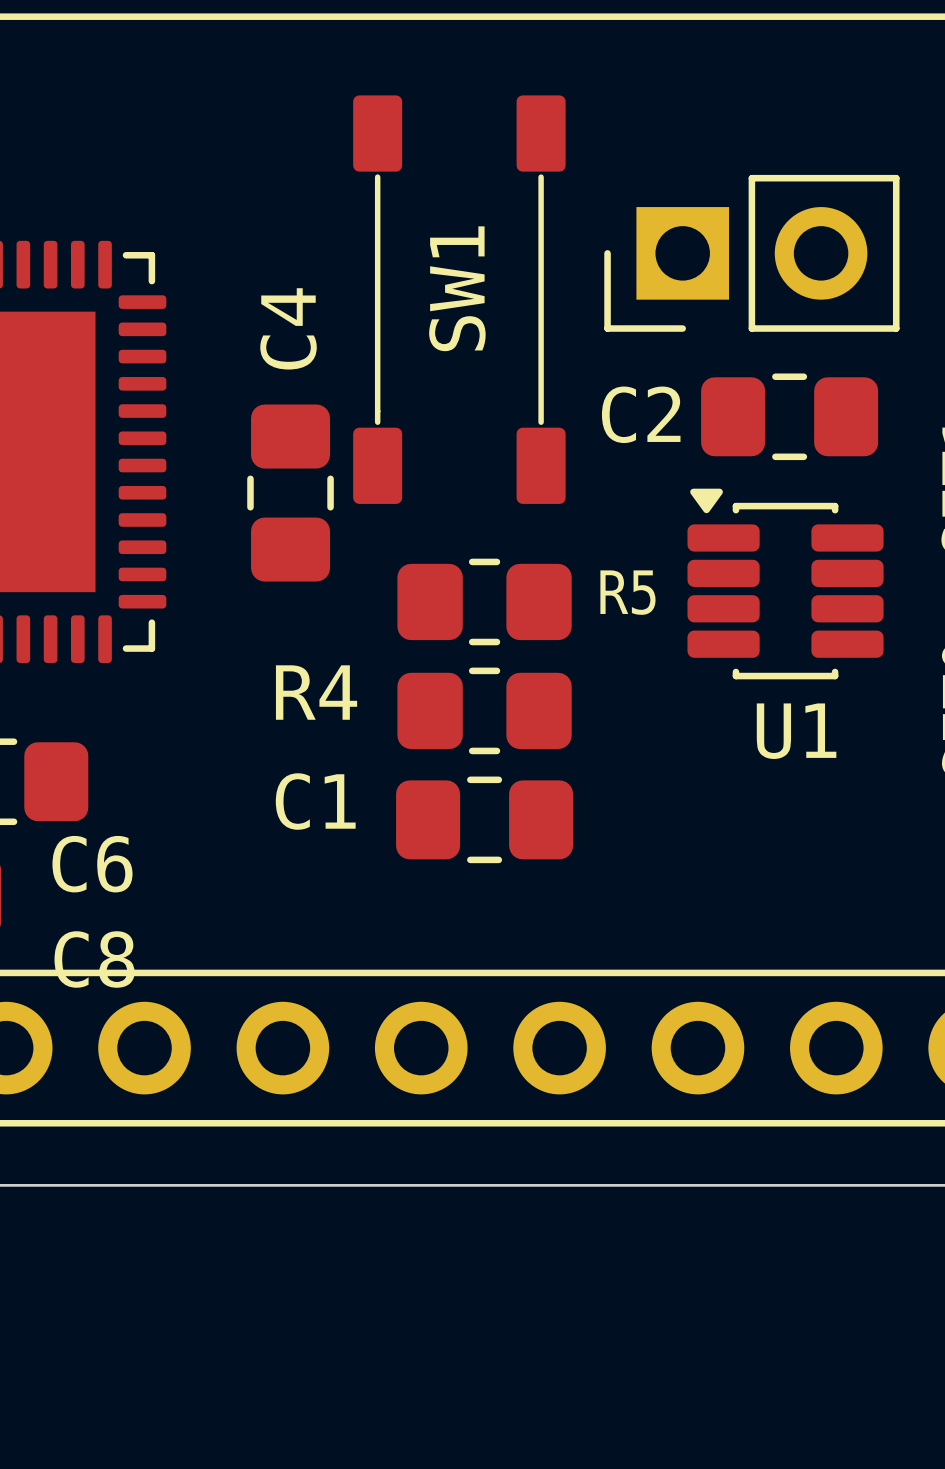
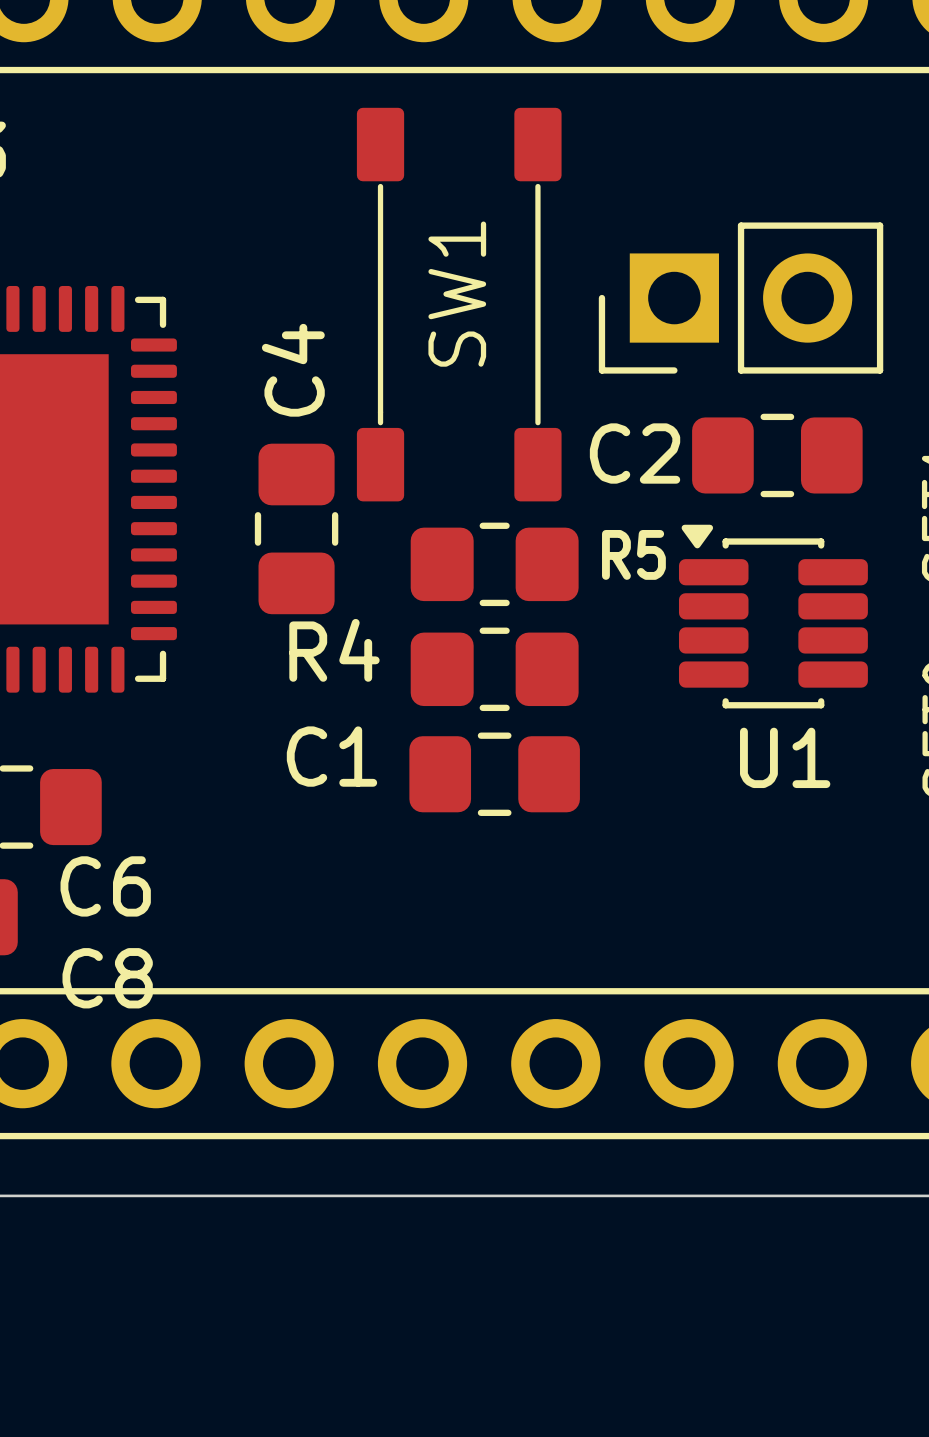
SW1 position: (459, 299) -> (459, 304)
R5 position: (484, 601) -> (494, 564)
R4 position: (484, 710) -> (494, 669)
C1 position: (484, 819) -> (494, 774)

